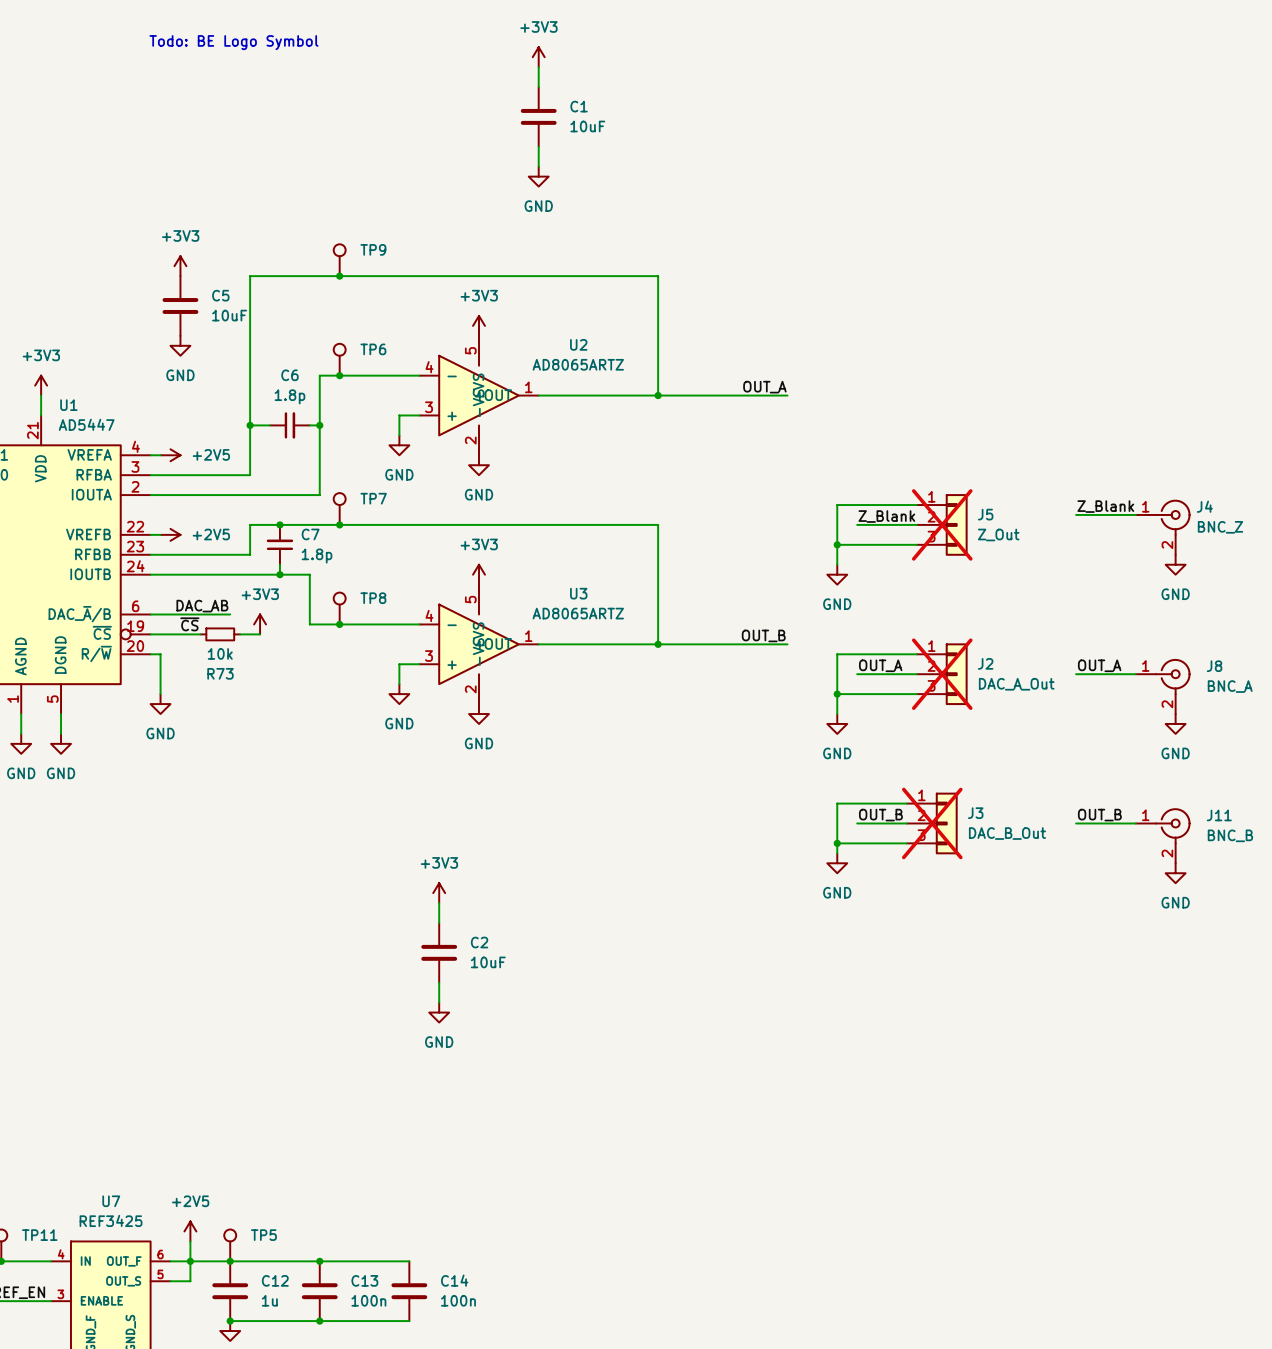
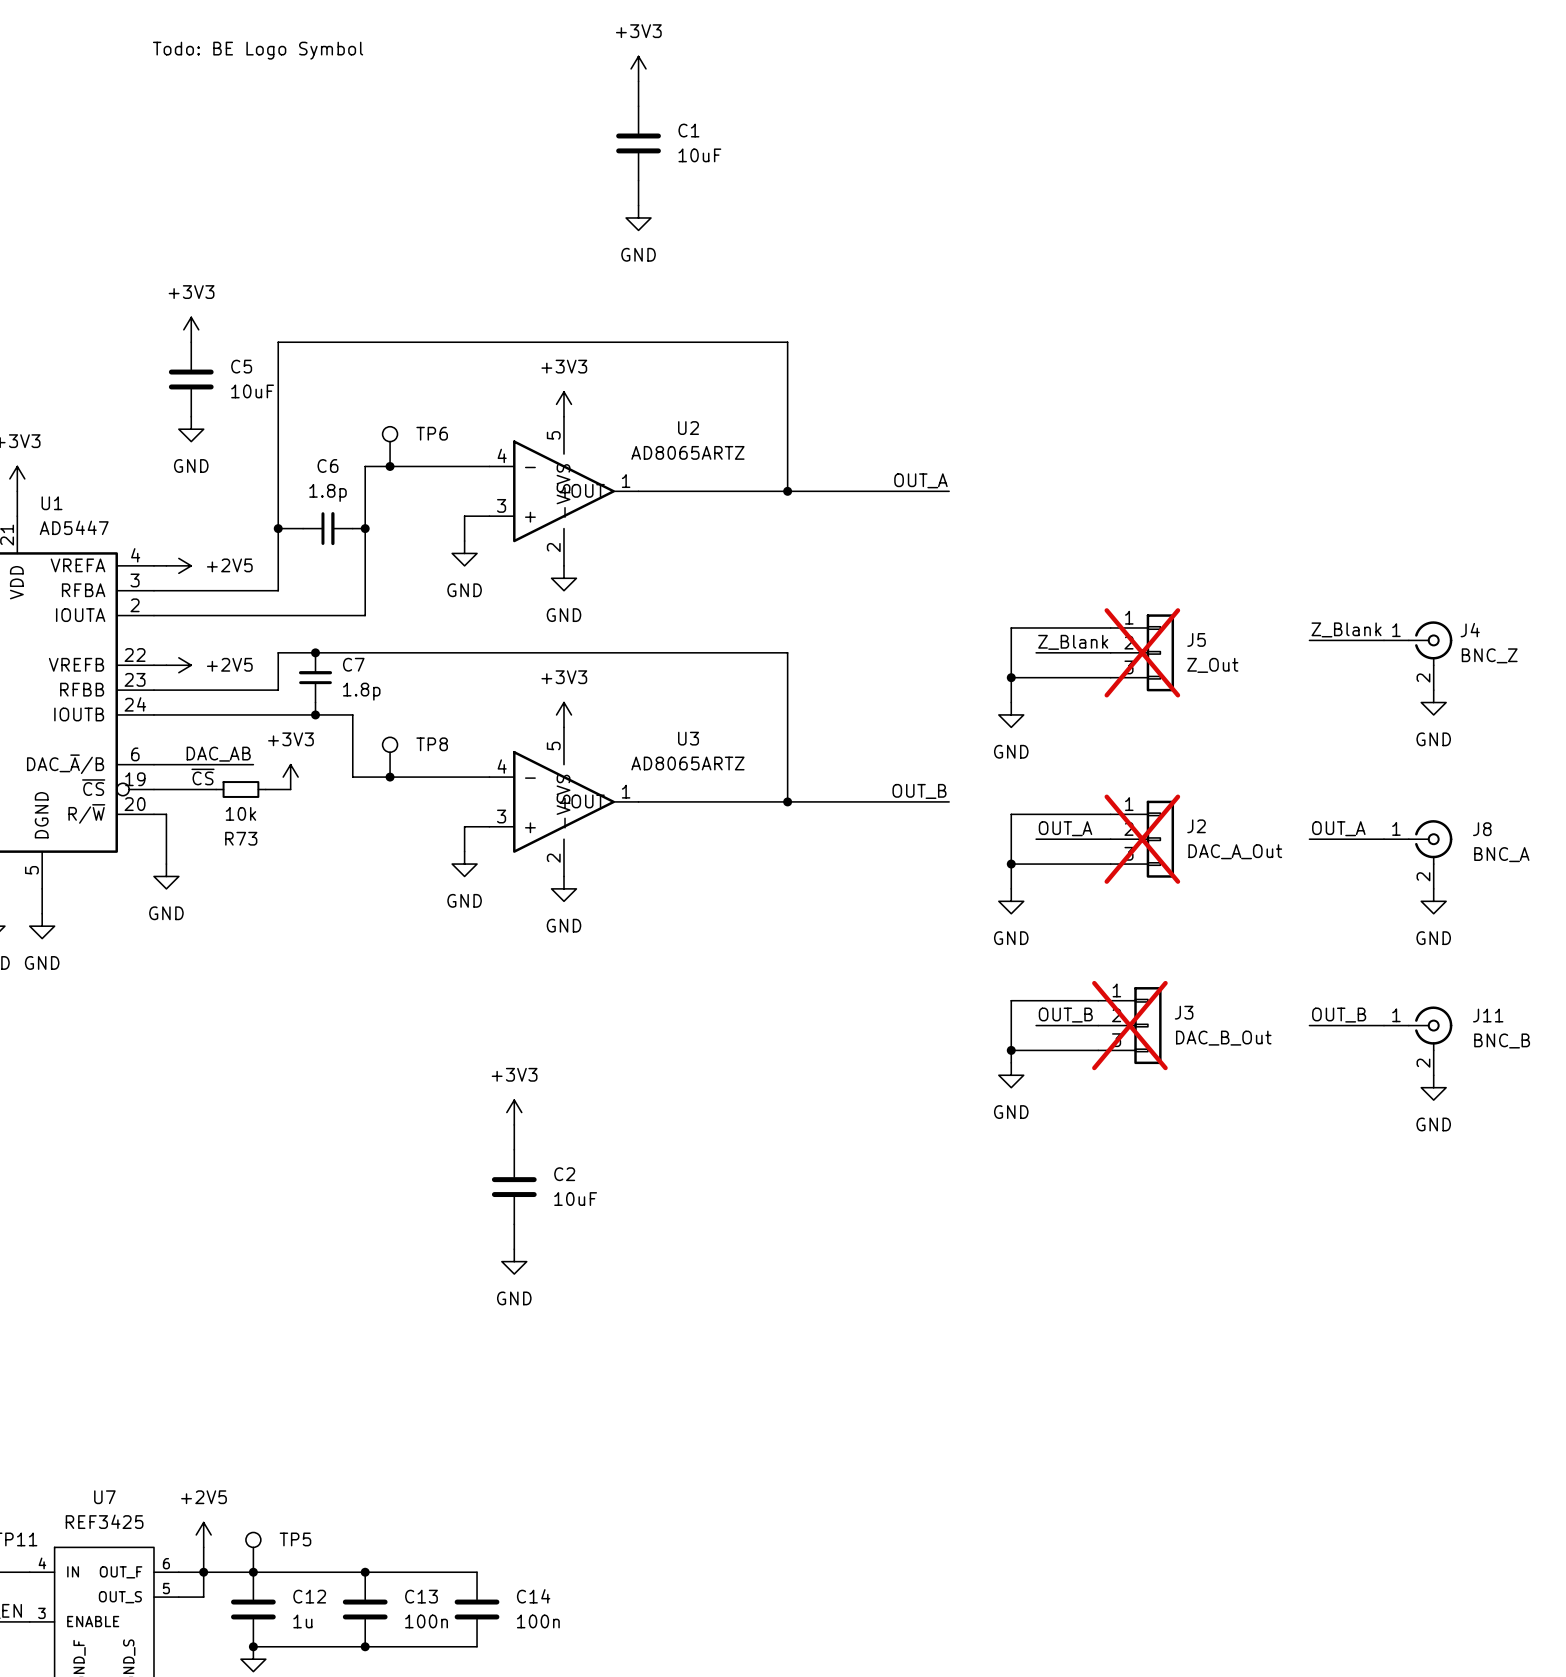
TP9: (339, 260) -> none
junction: (339, 276) -> none
TP7: (339, 509) -> none
junction: (339, 524) -> none

